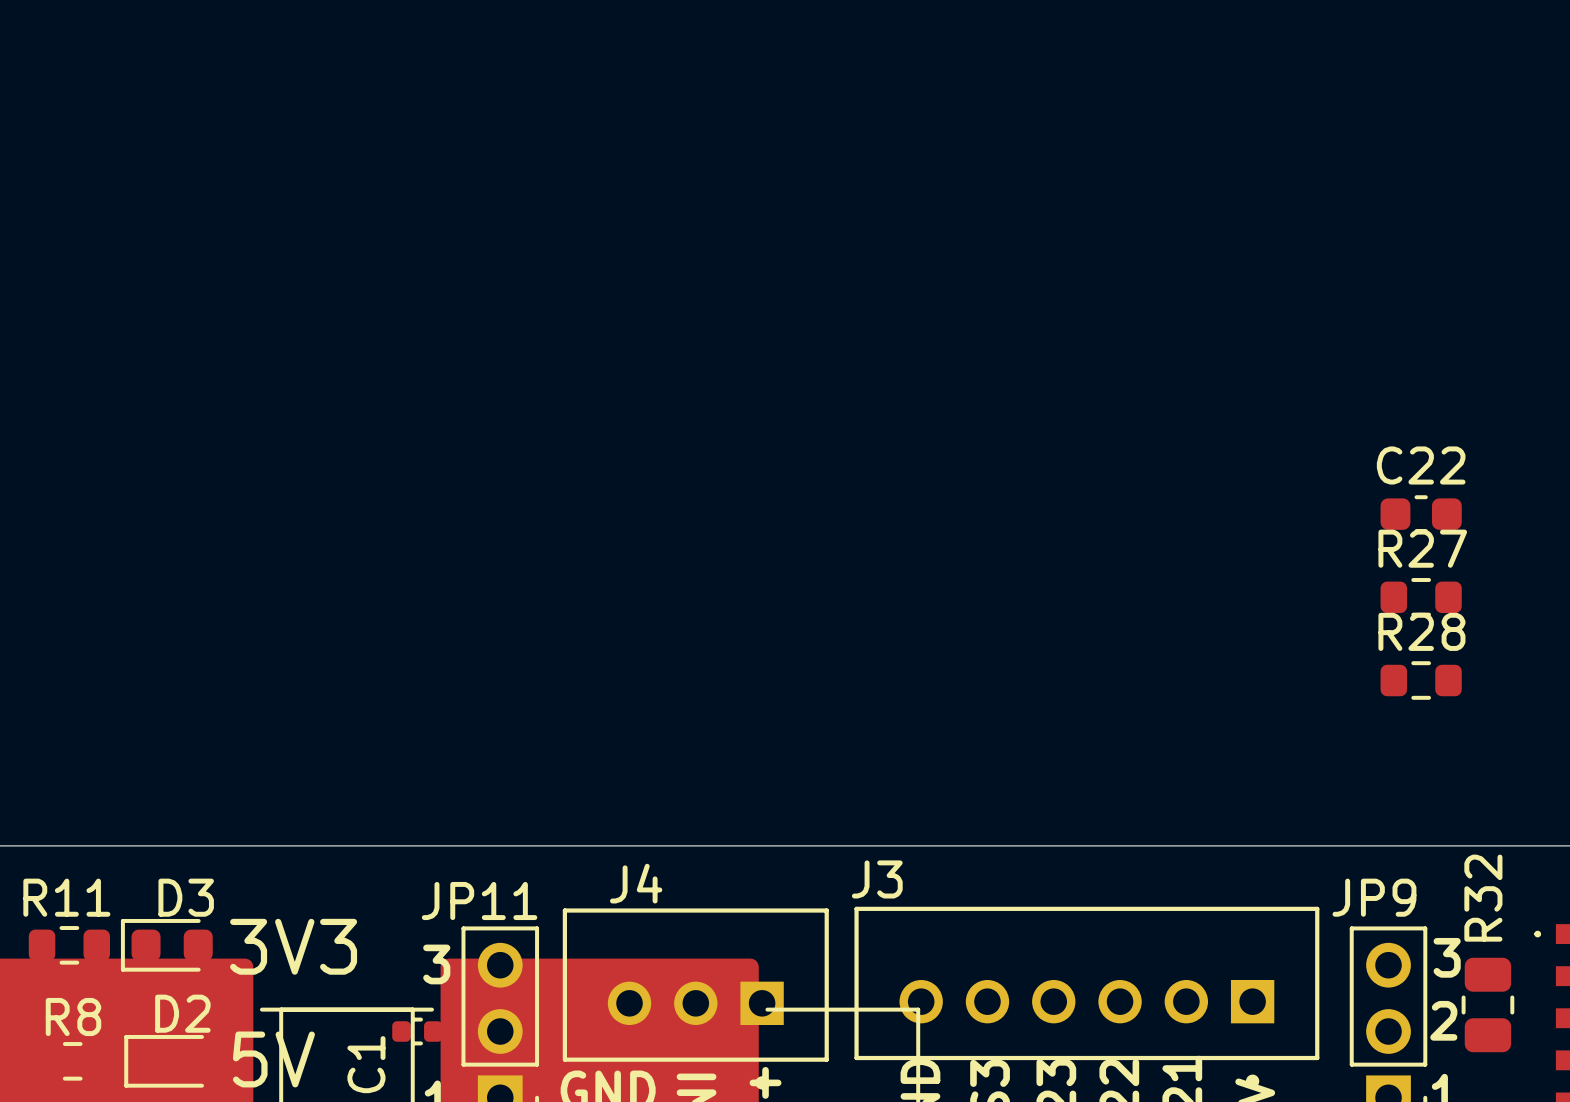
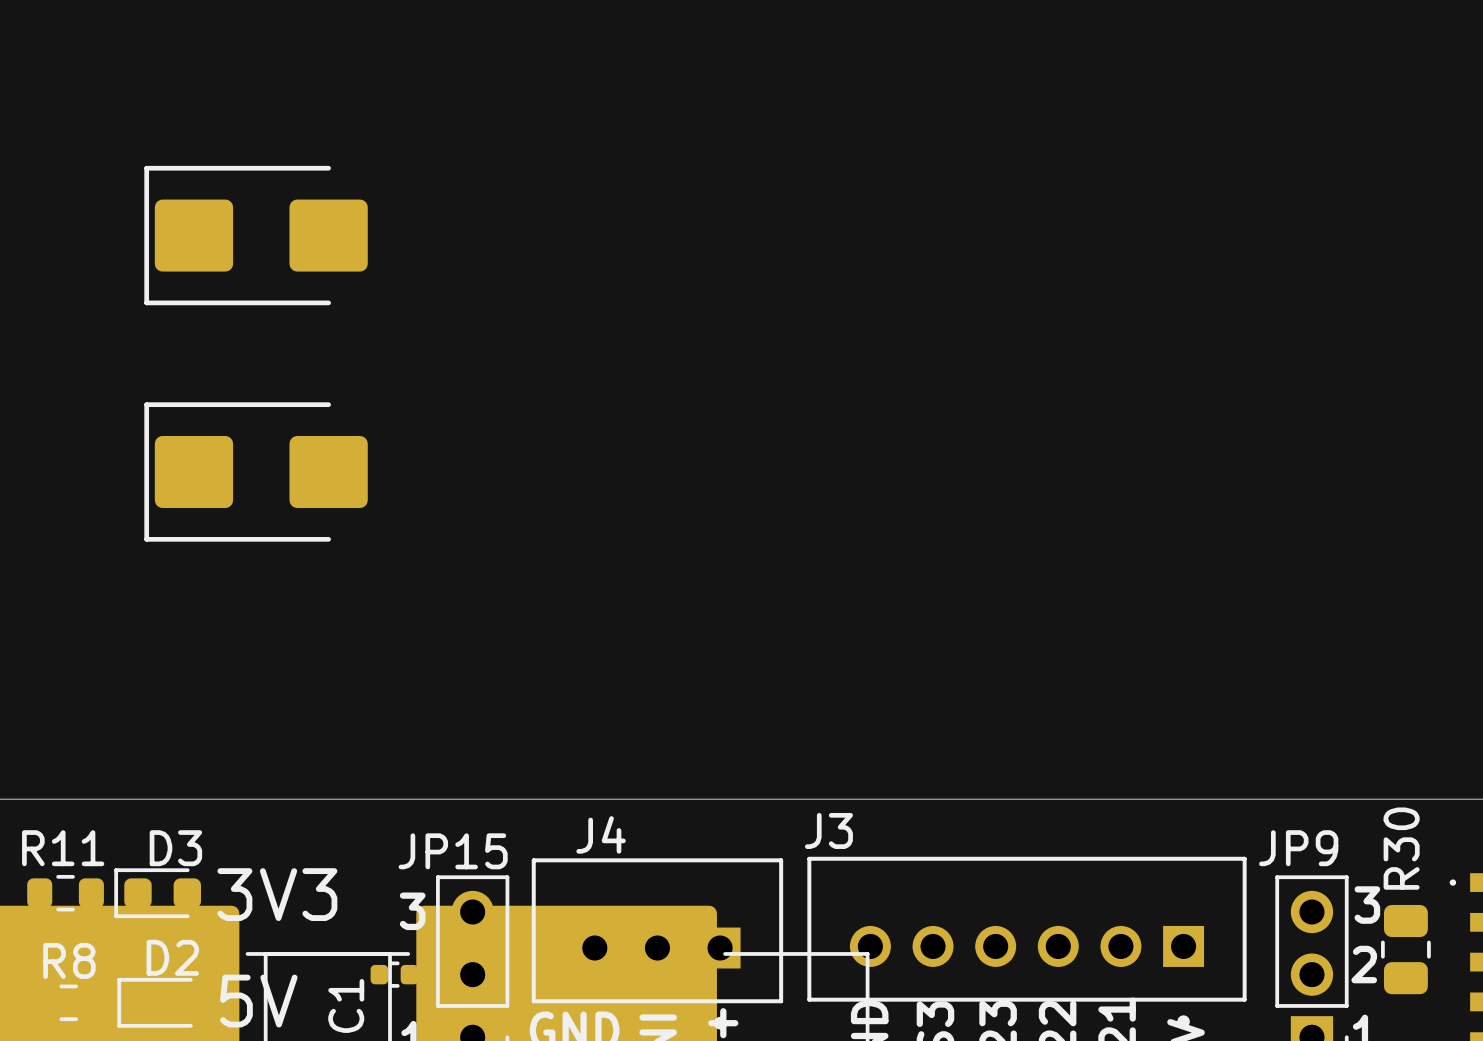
part: none -> (256, 235)
part: none -> (256, 472)
C22: (1421, 514) -> none
R27: (1421, 597) -> none
R28: (1421, 680) -> none
R32 name: R32 (1483, 898) -> R30 (1401, 848)
JP11 name: JP11 (479, 901) -> JP15 (453, 851)

